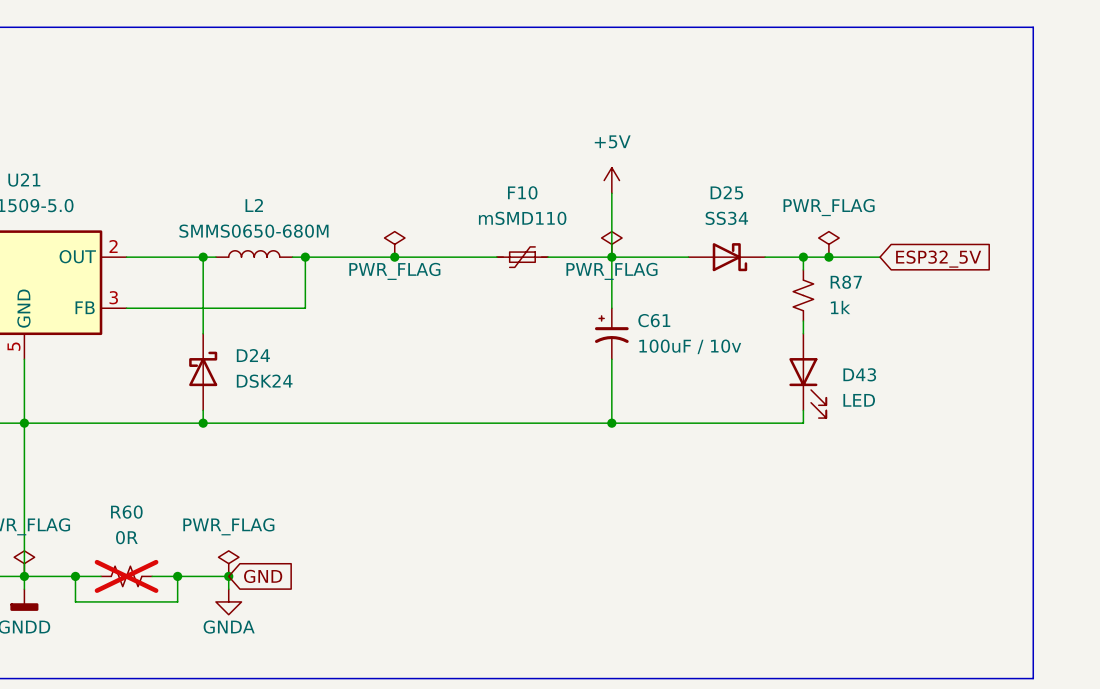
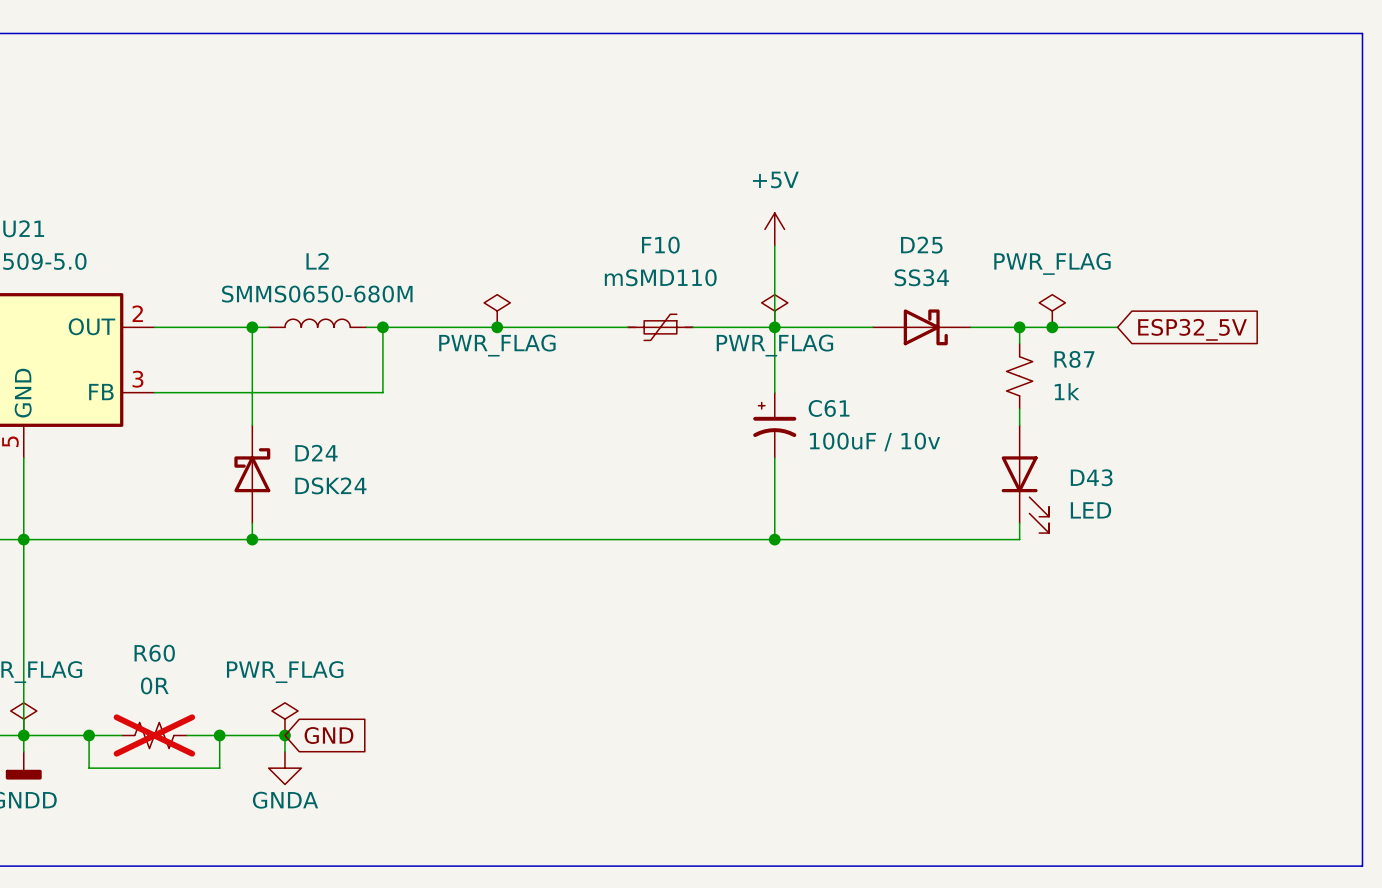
line: (1033, 27) (1033, 678) -> (1313, 33) (1362, 33) (1362, 866) (1313, 866)

